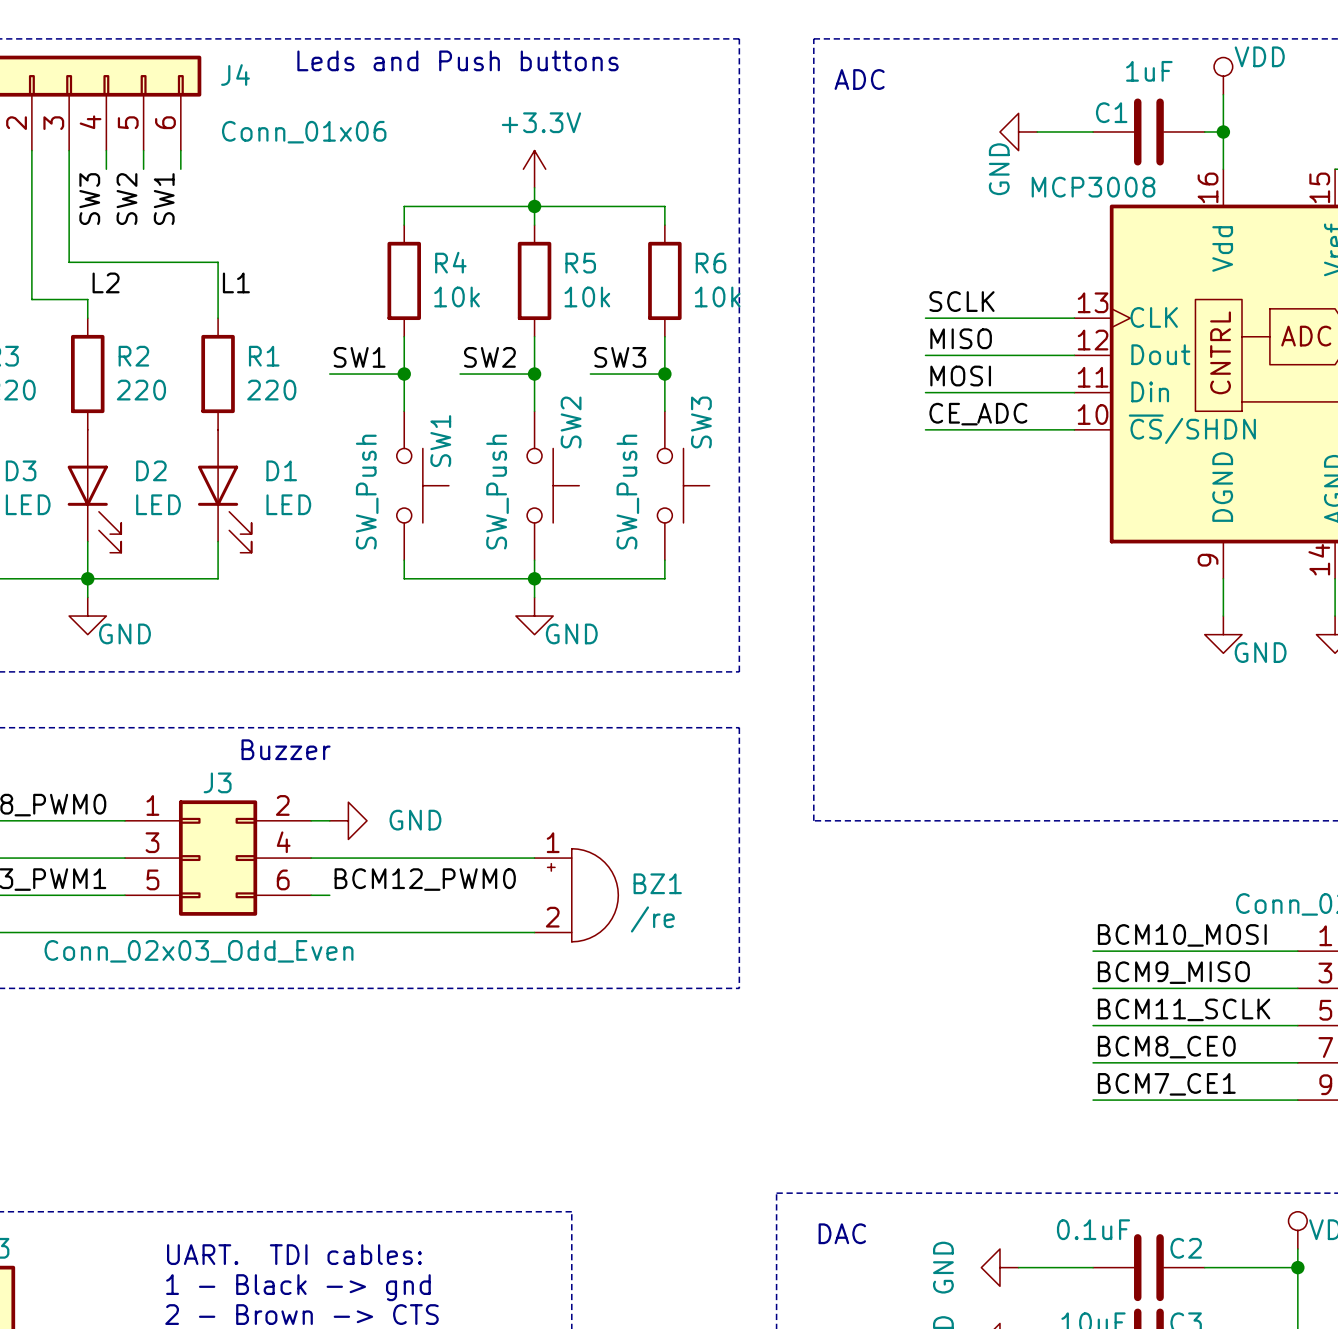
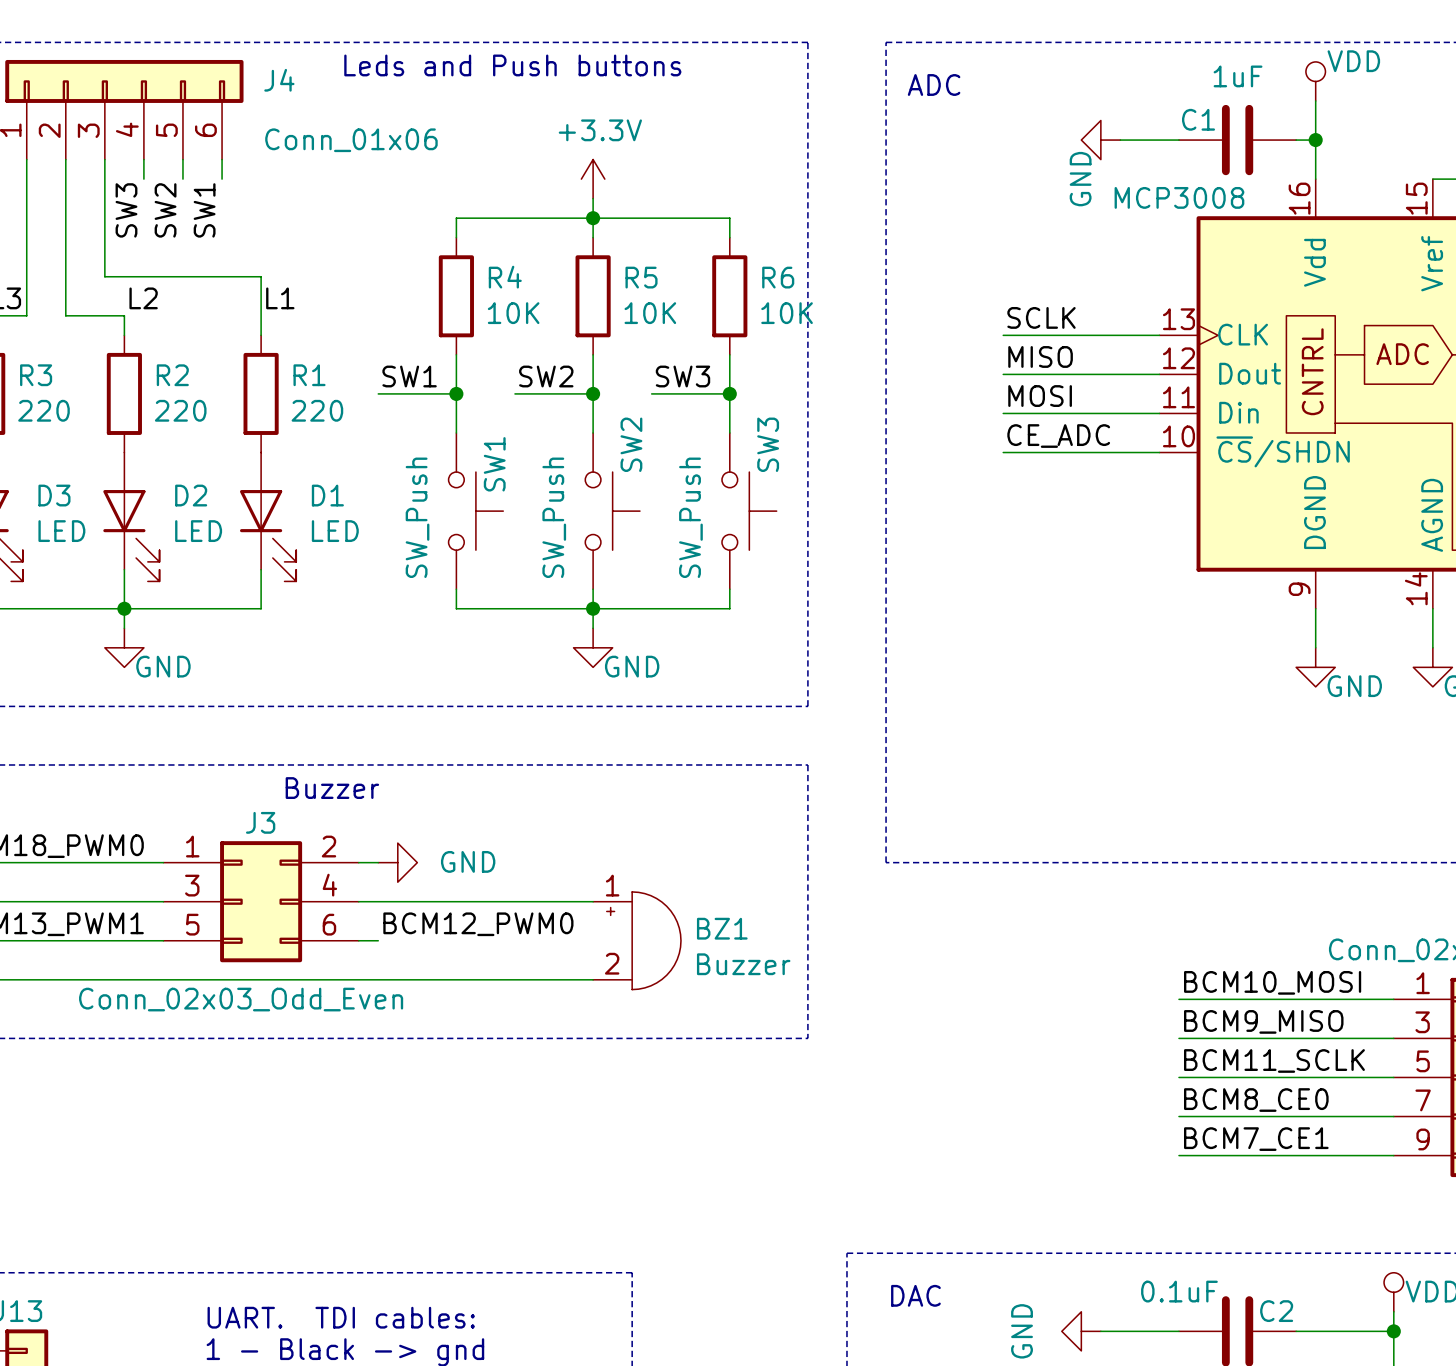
R4 value: 10k (457, 296) -> 10K (513, 313)
R5 value: 10k (587, 296) -> 10K (650, 313)
R6 value: 10k (717, 296) -> 10K (787, 313)
BZ1 value: /re (652, 919) -> Buzzer (743, 964)

